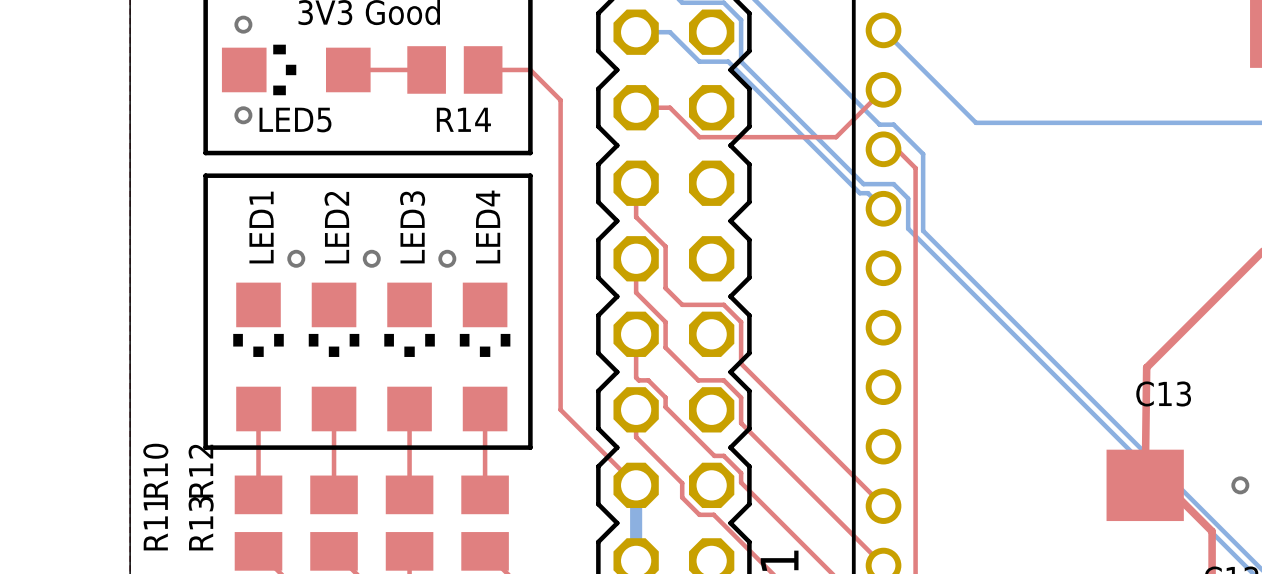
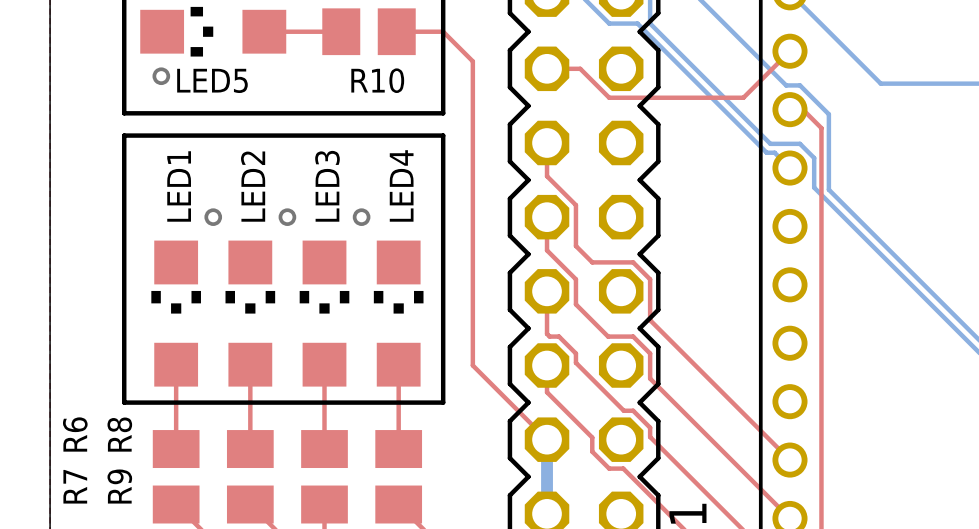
R14 name: R14 (463, 119) -> R10 (377, 80)
R10 name: R10 (155, 470) -> R6 (75, 434)
R12 name: R12 (200, 471) -> R8 (119, 434)
R11 name: R11 (155, 523) -> R7 (75, 486)
R13 name: R13 (201, 523) -> R9 (119, 486)

